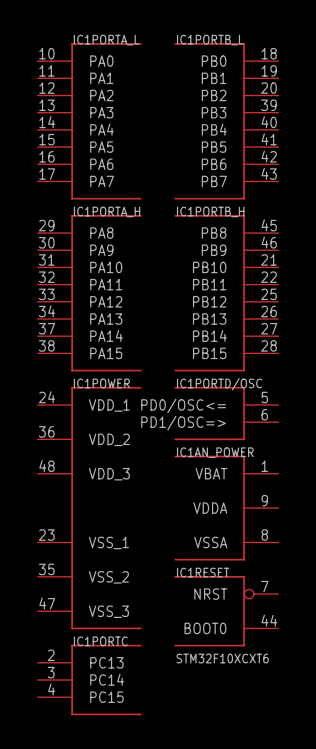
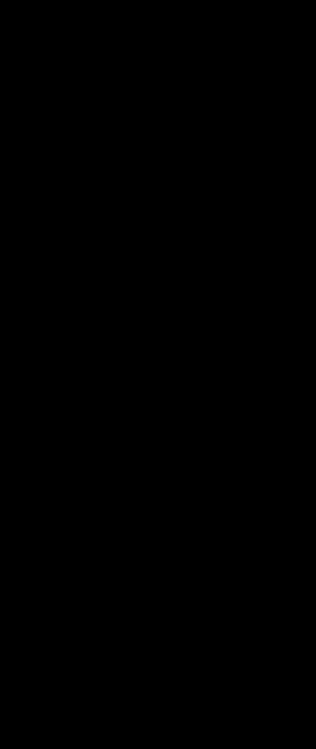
IC1PORTA_L: (89, 121) -> none
IC1PORTB_L: (226, 121) -> none
IC1PORTA_H: (89, 293) -> none
IC1PORTB_H: (226, 293) -> none
IC1PORTD/OSC: (226, 413) -> none
IC1POWER: (89, 508) -> none
IC1AN_POWER: (226, 508) -> none
IC1RESET: STM32F10XCXT6 (226, 611) -> none
IC1PORTC: (89, 680) -> none

